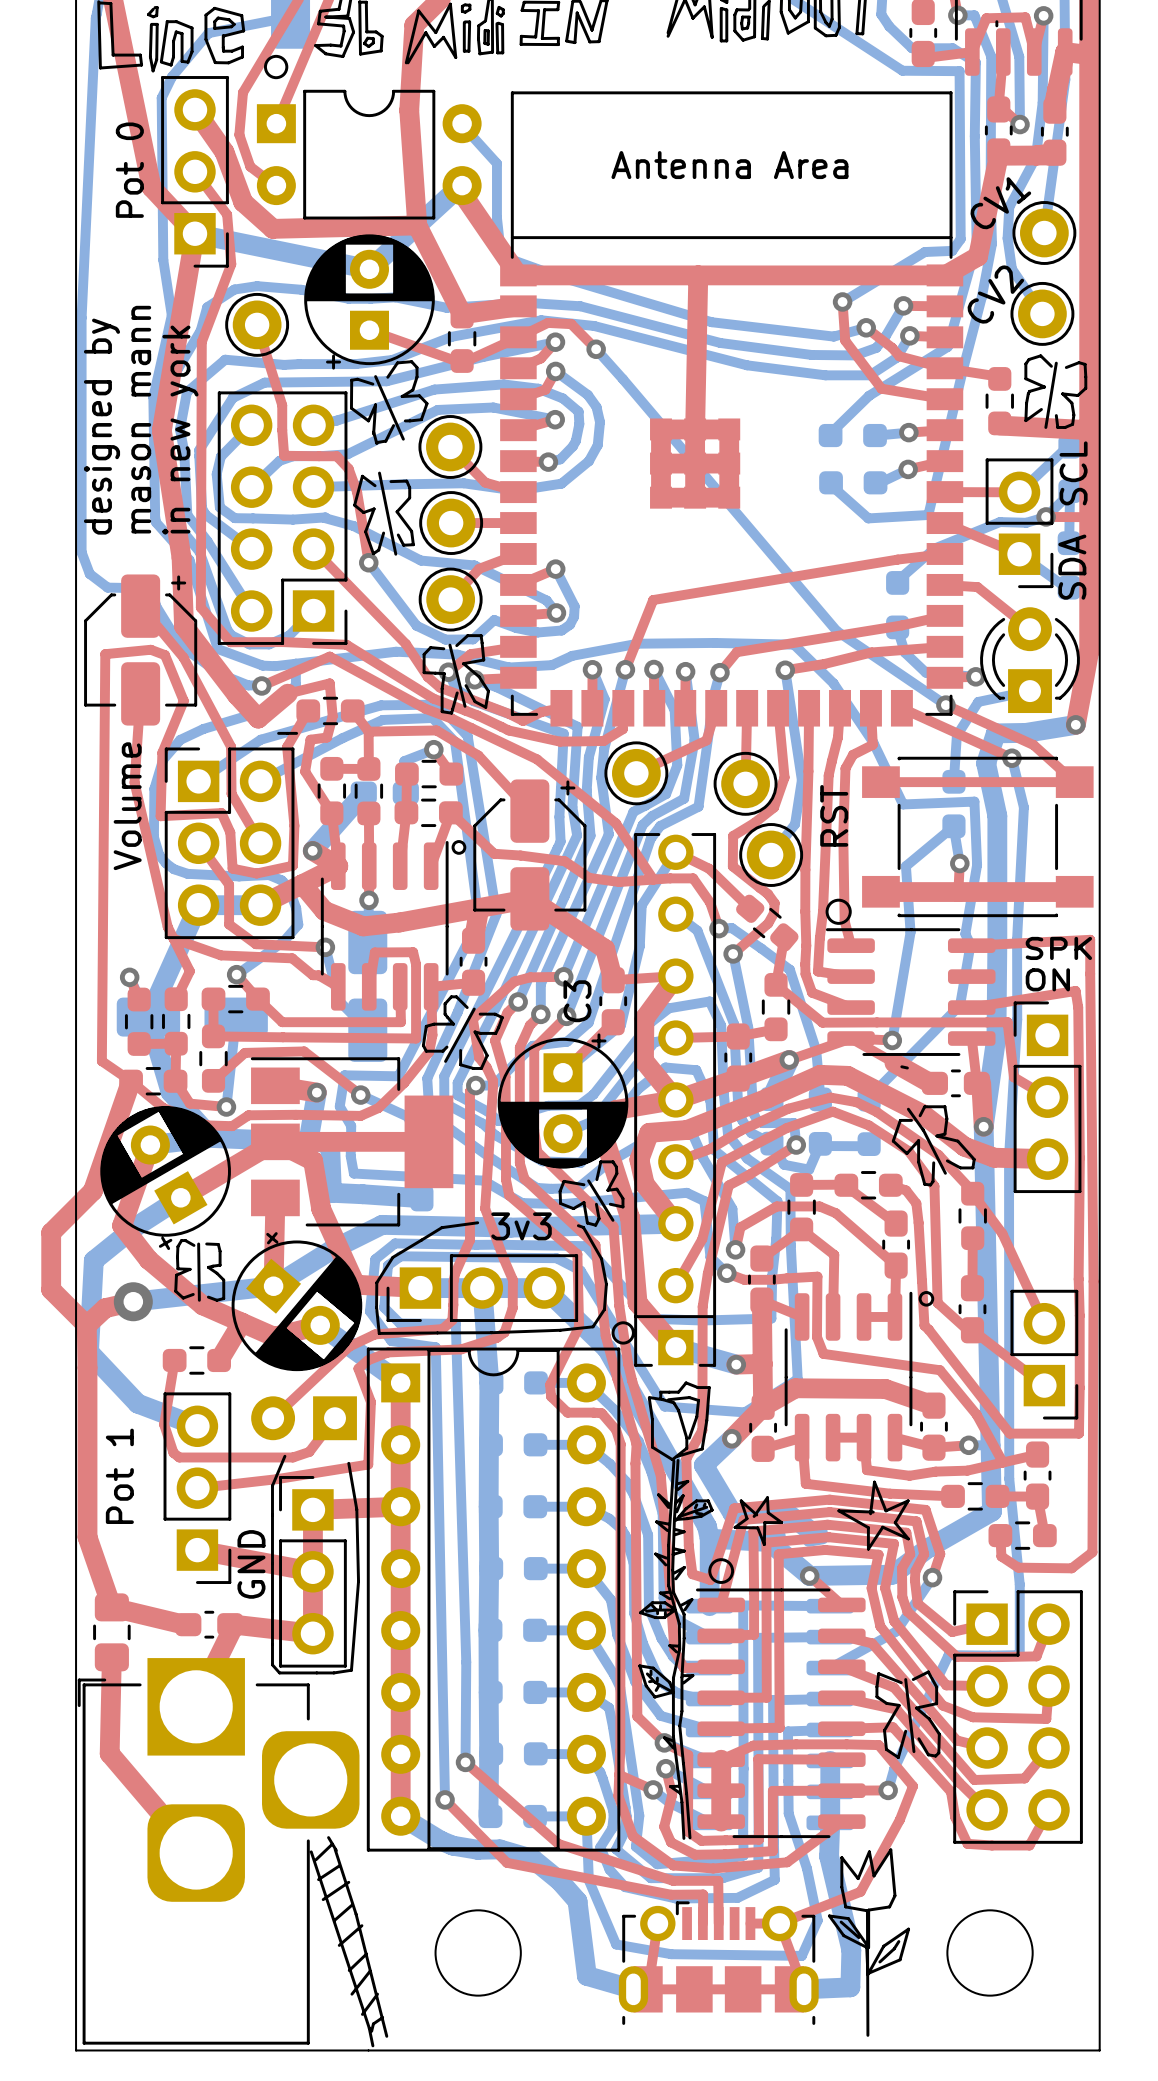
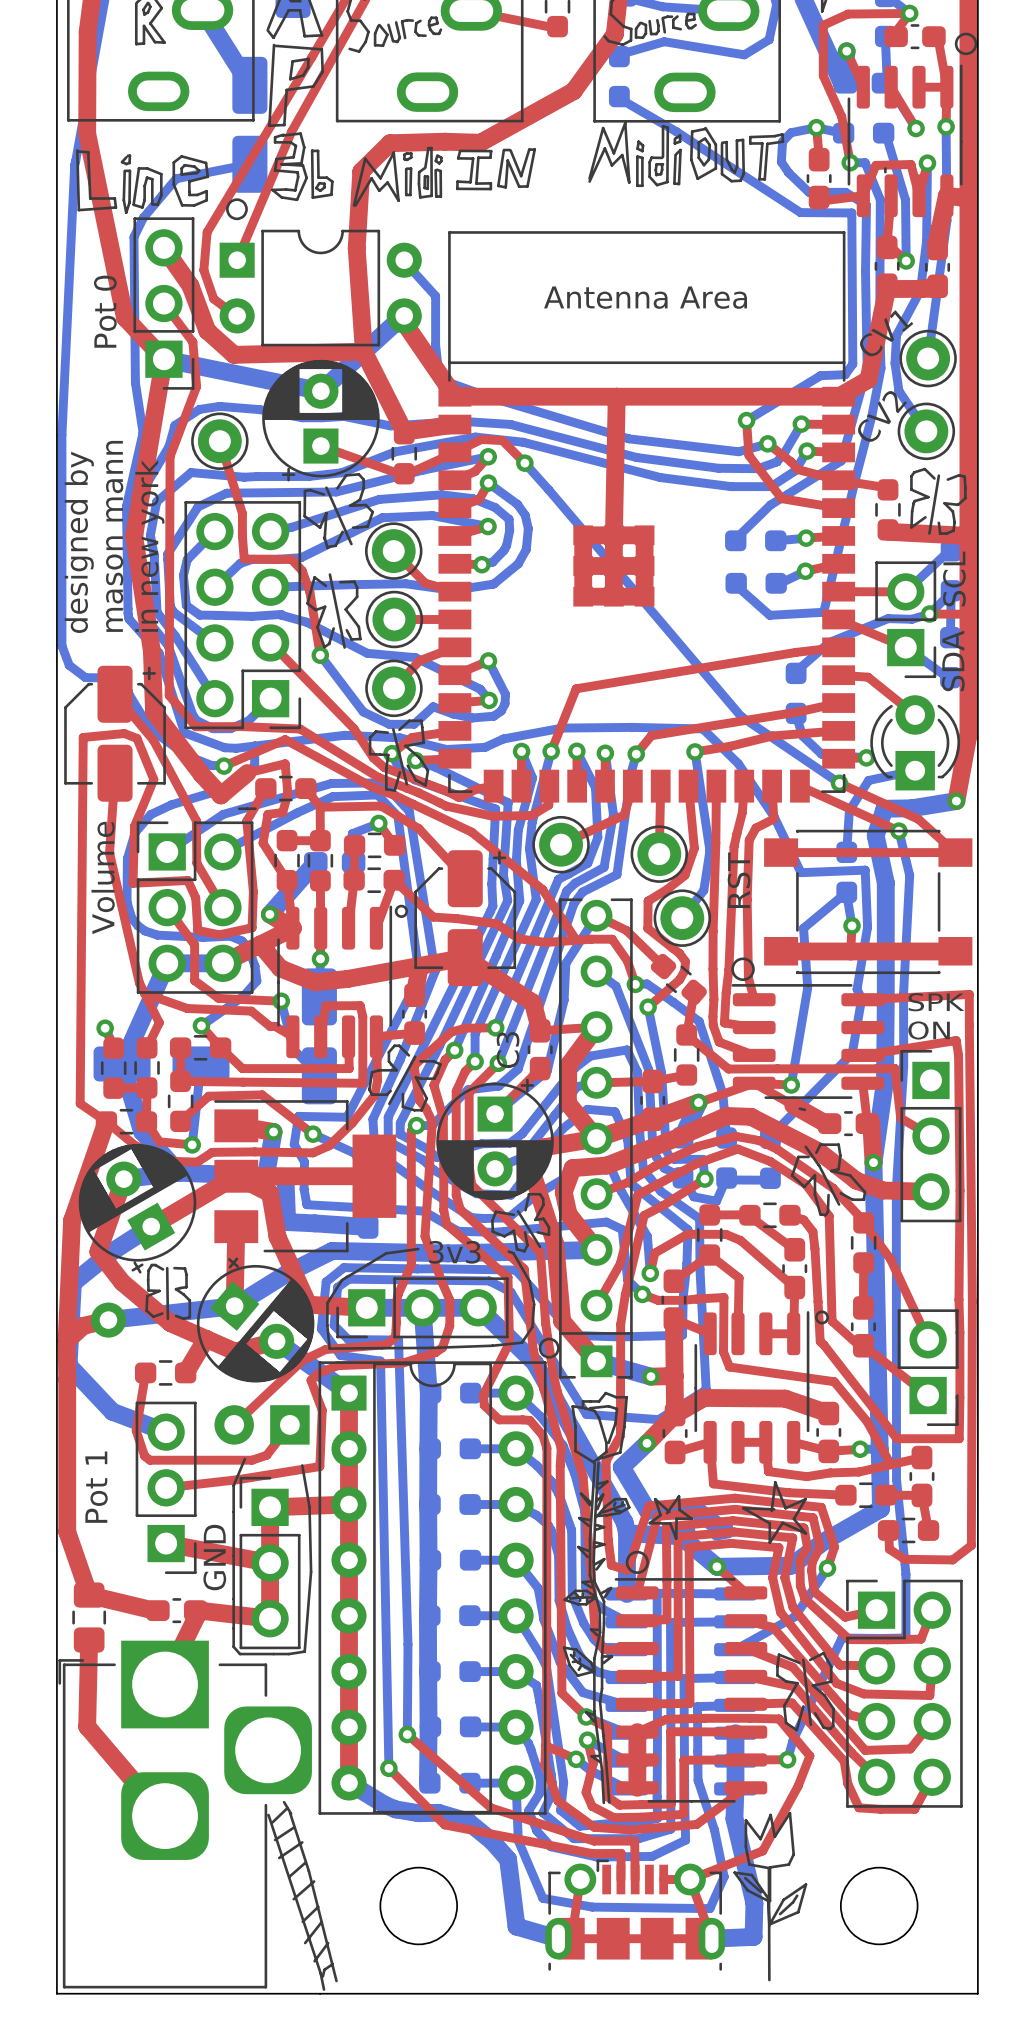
top track: (92, 1191) (51, 1232) (51, 1289) (86, 1325) -> (72, 1220) (66, 1341)

